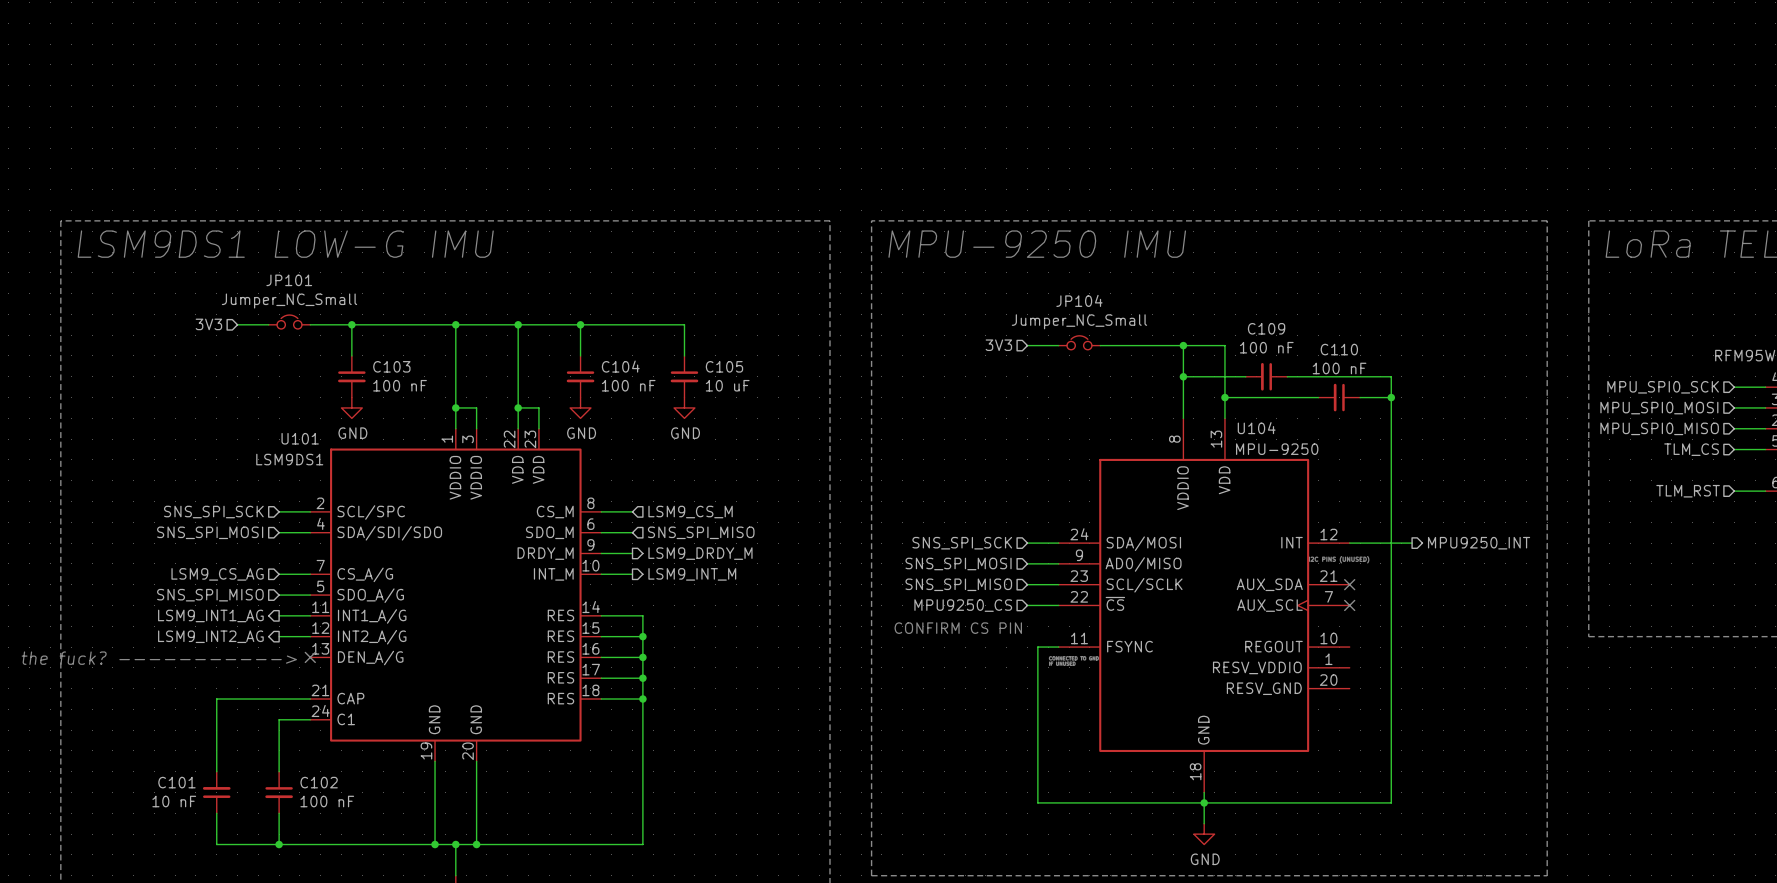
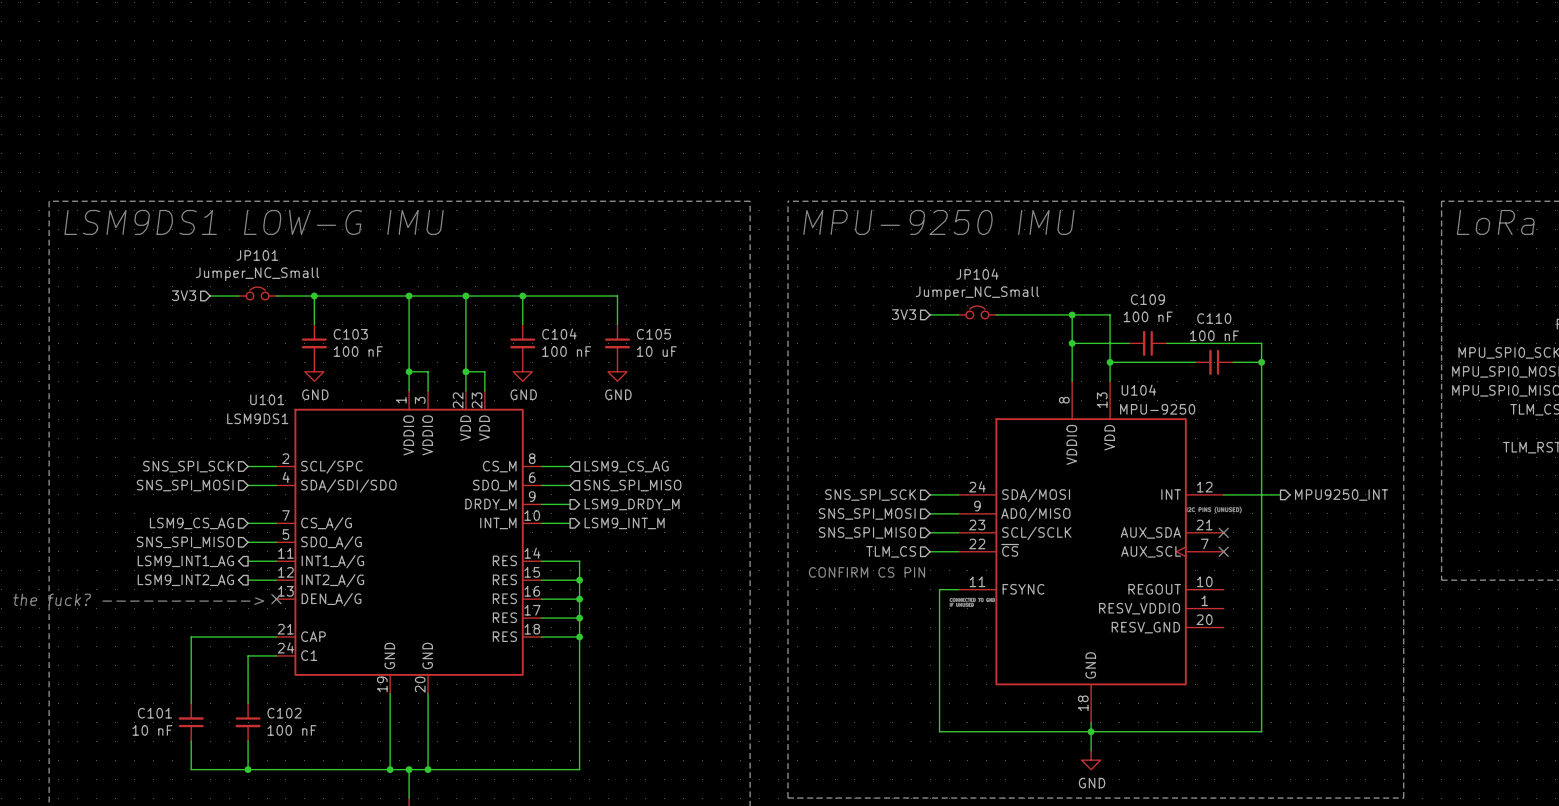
hierarchical label: LSM9_CS_M (690, 512) -> LSM9_CS_AG (626, 466)
hierarchical label: MPU9250_CS (963, 605) -> TLM_CS (891, 551)

